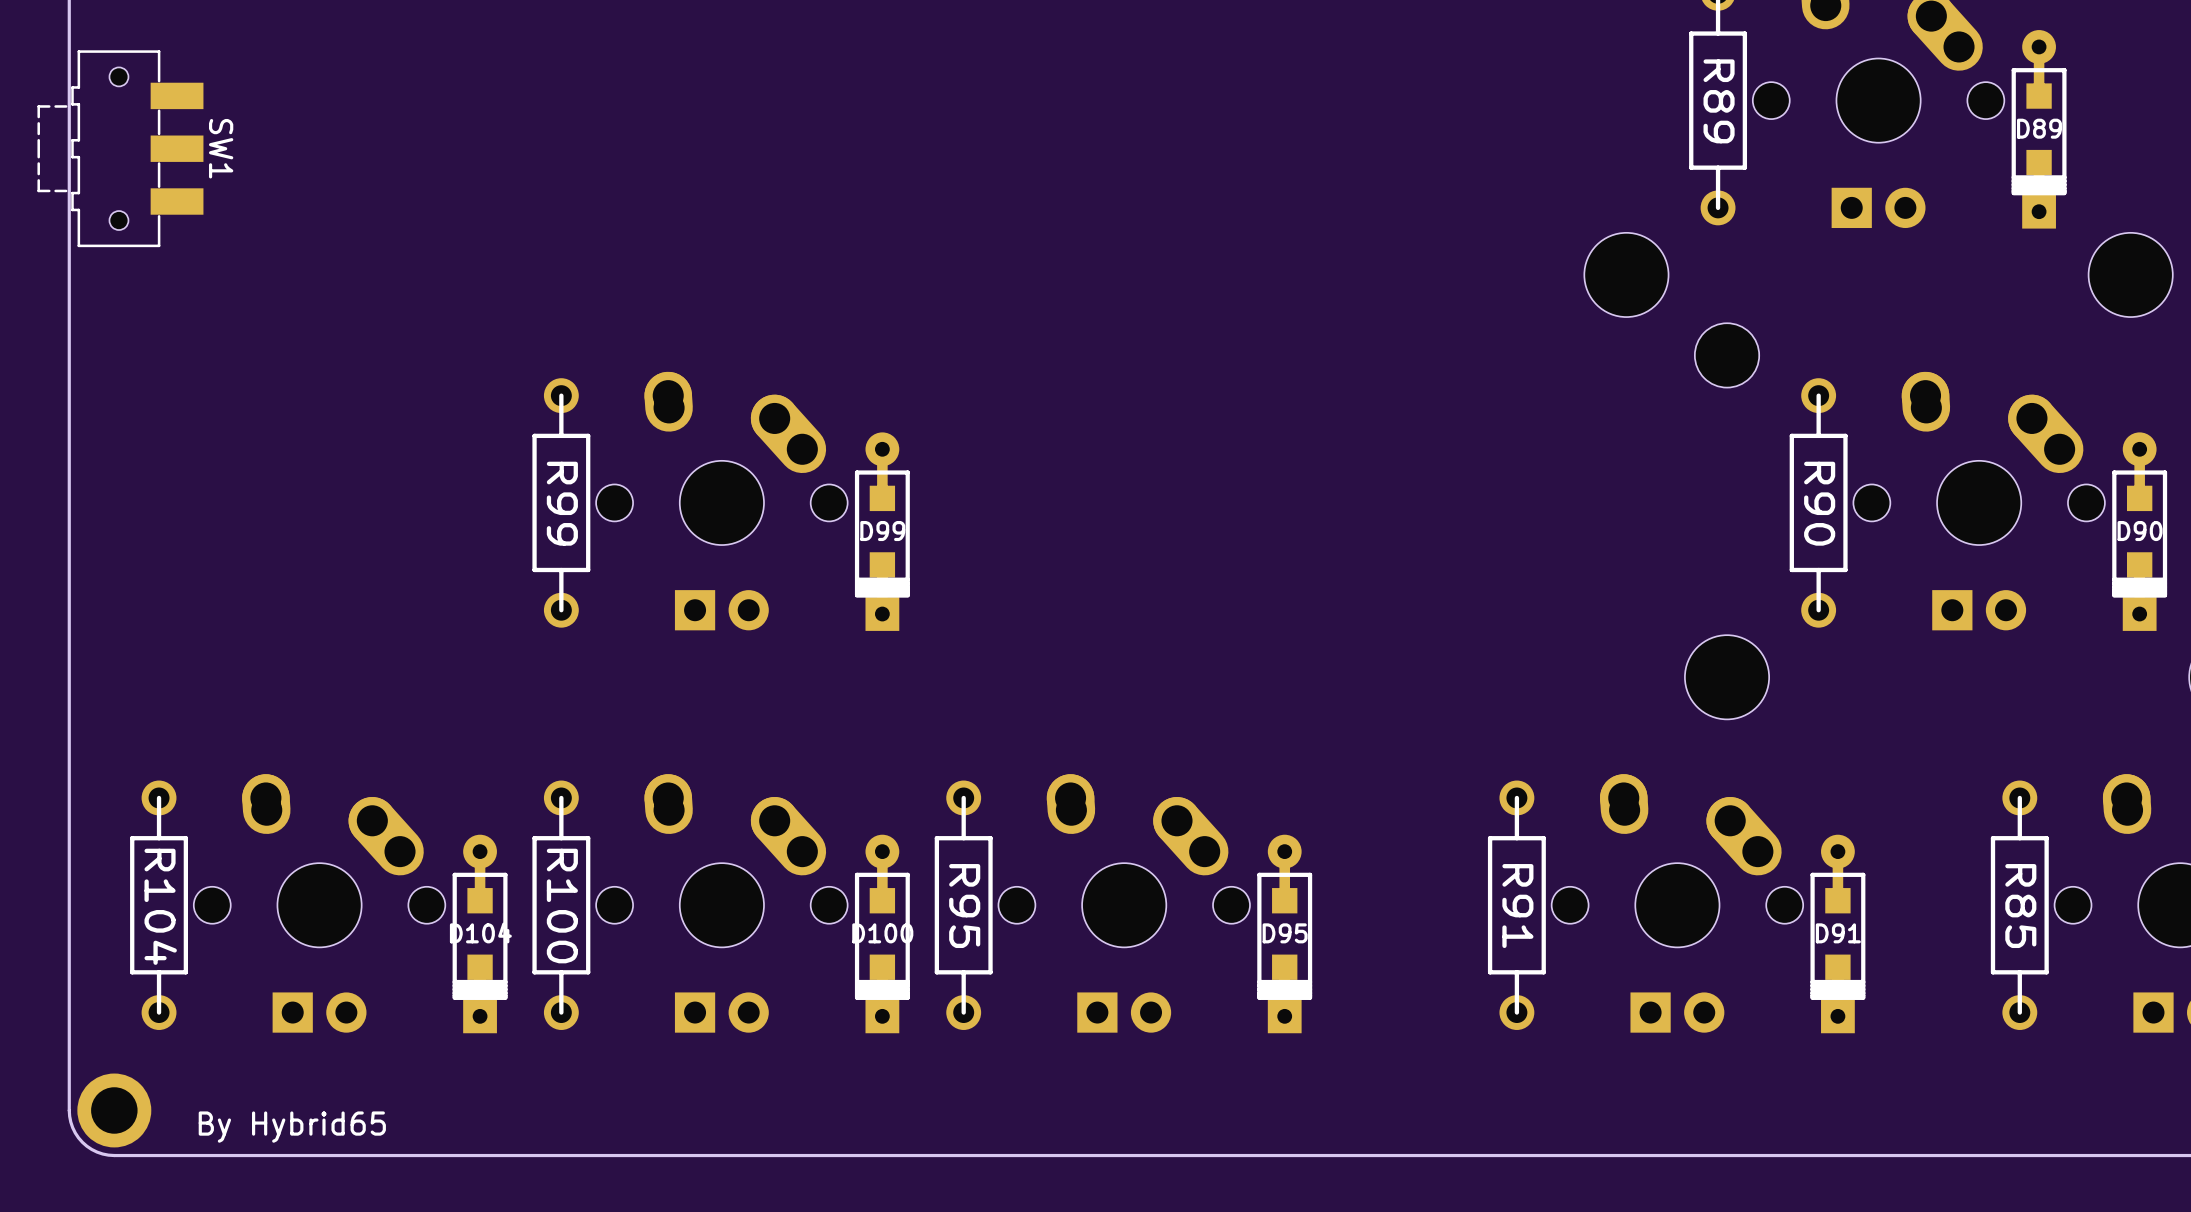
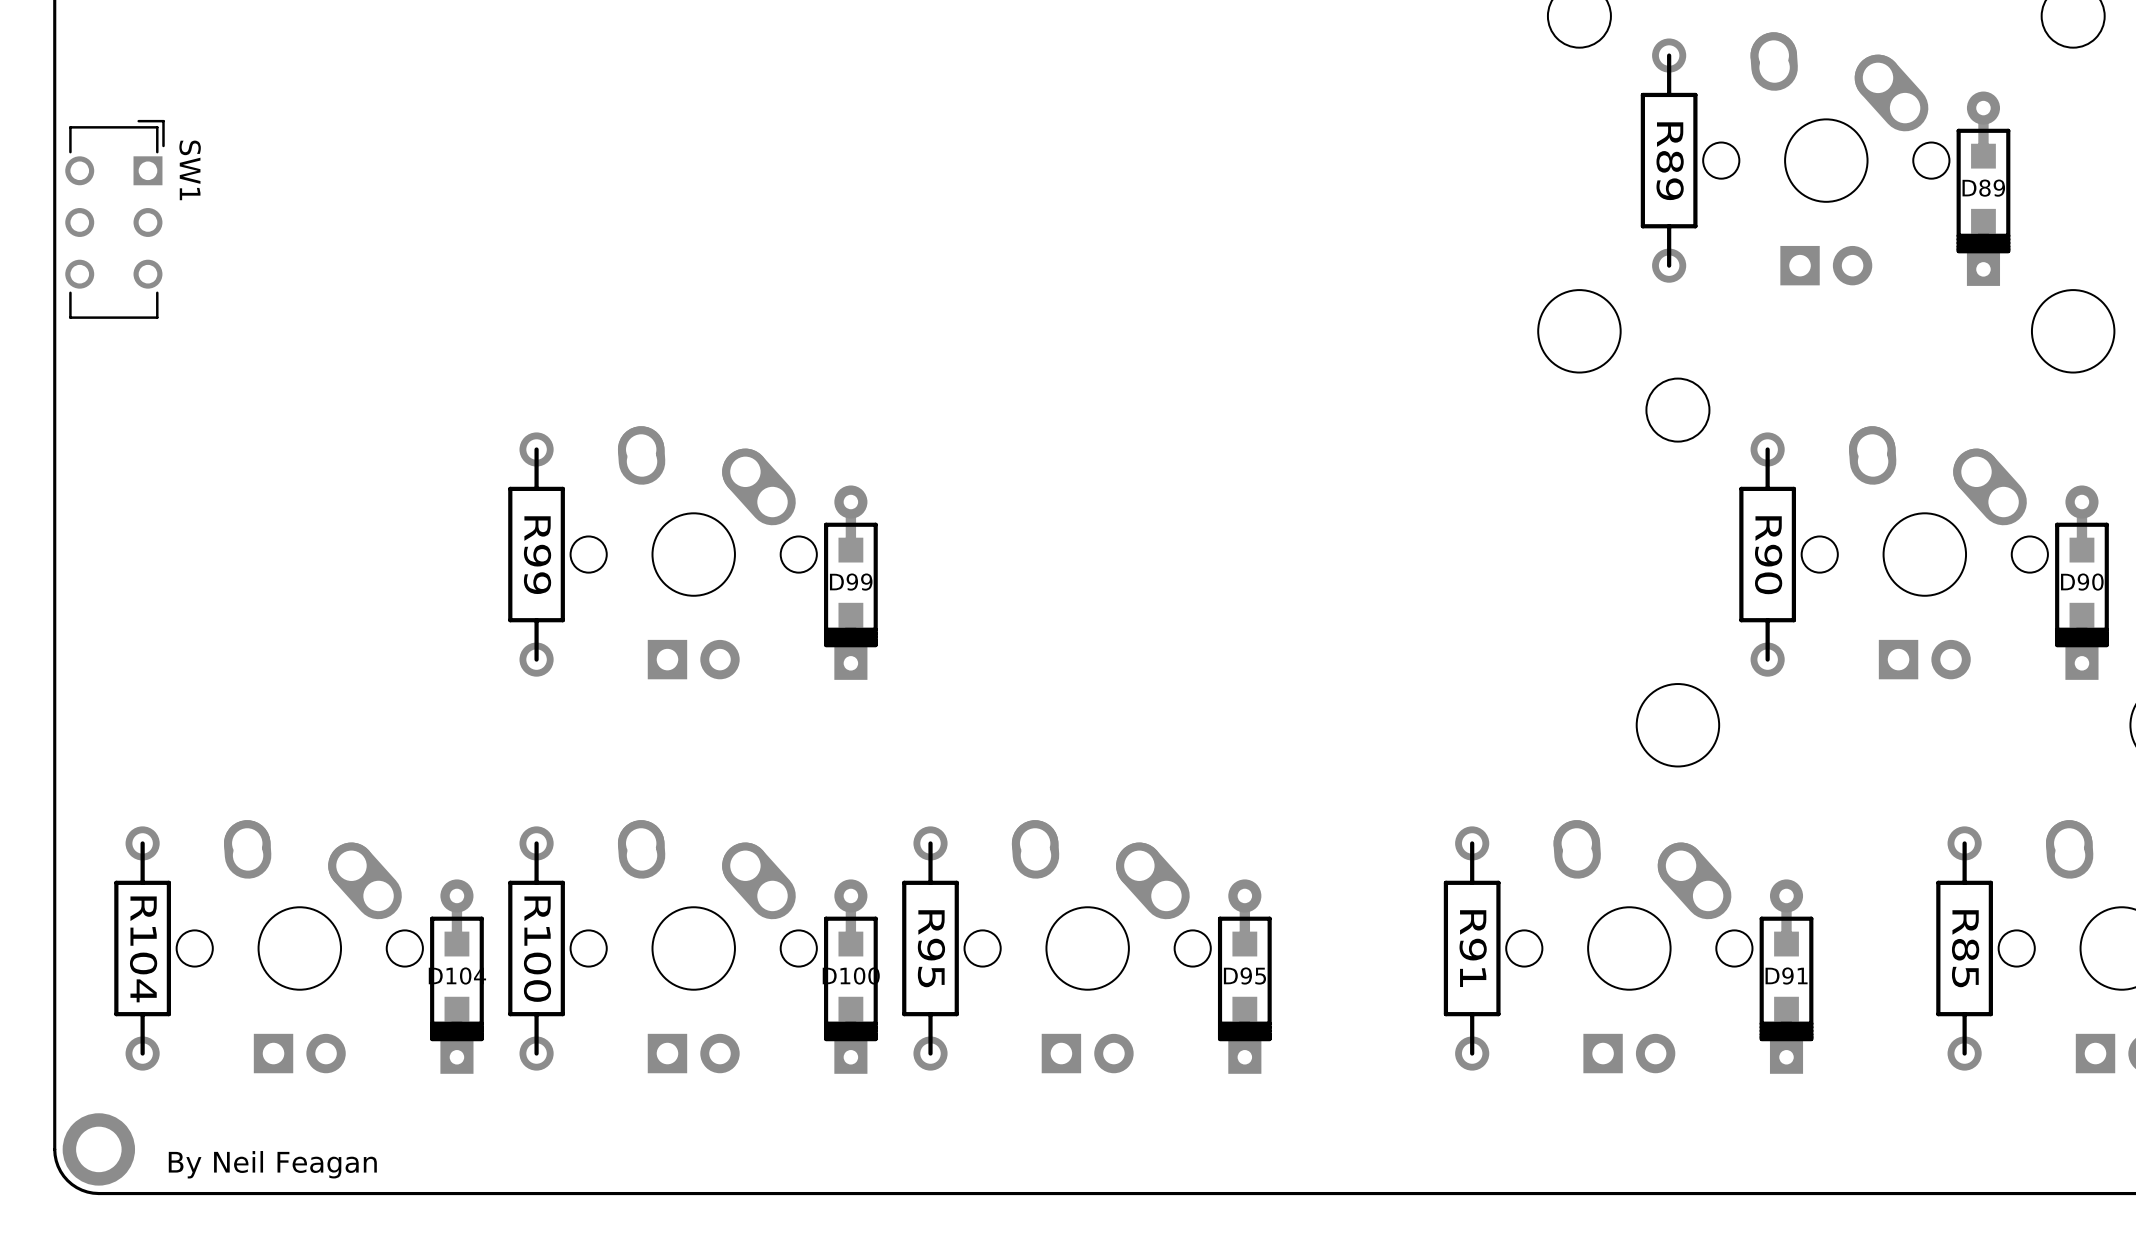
SW1 footprint: [37, 50, 204, 248] -> [65, 119, 165, 319]
SW1 name position: SW1 (221, 148) -> SW1 (190, 170)
text: By Hybrid65 (292, 1127) -> By Neil Feagan (272, 1164)

